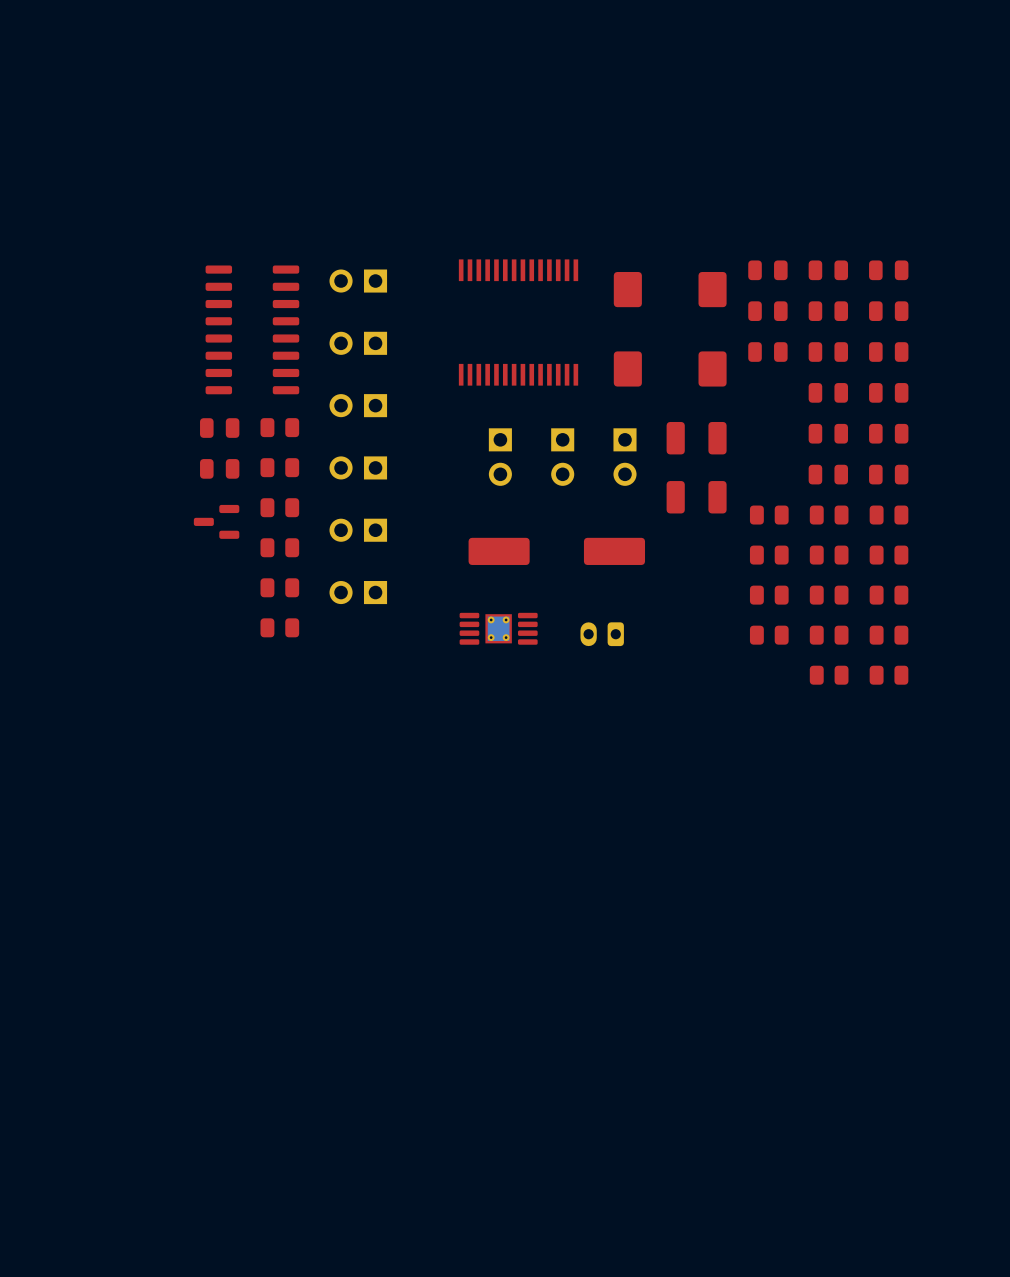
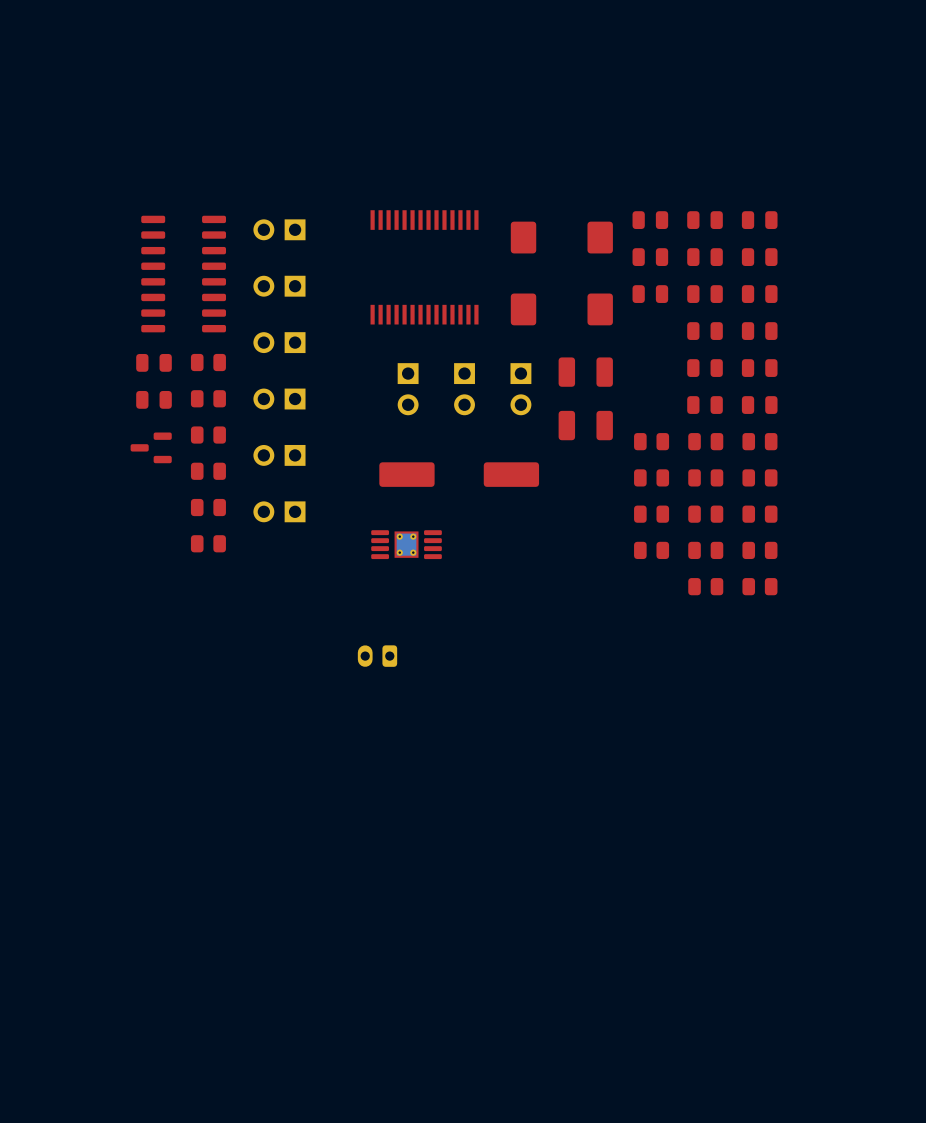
part position: (602, 634) -> (377, 656)

